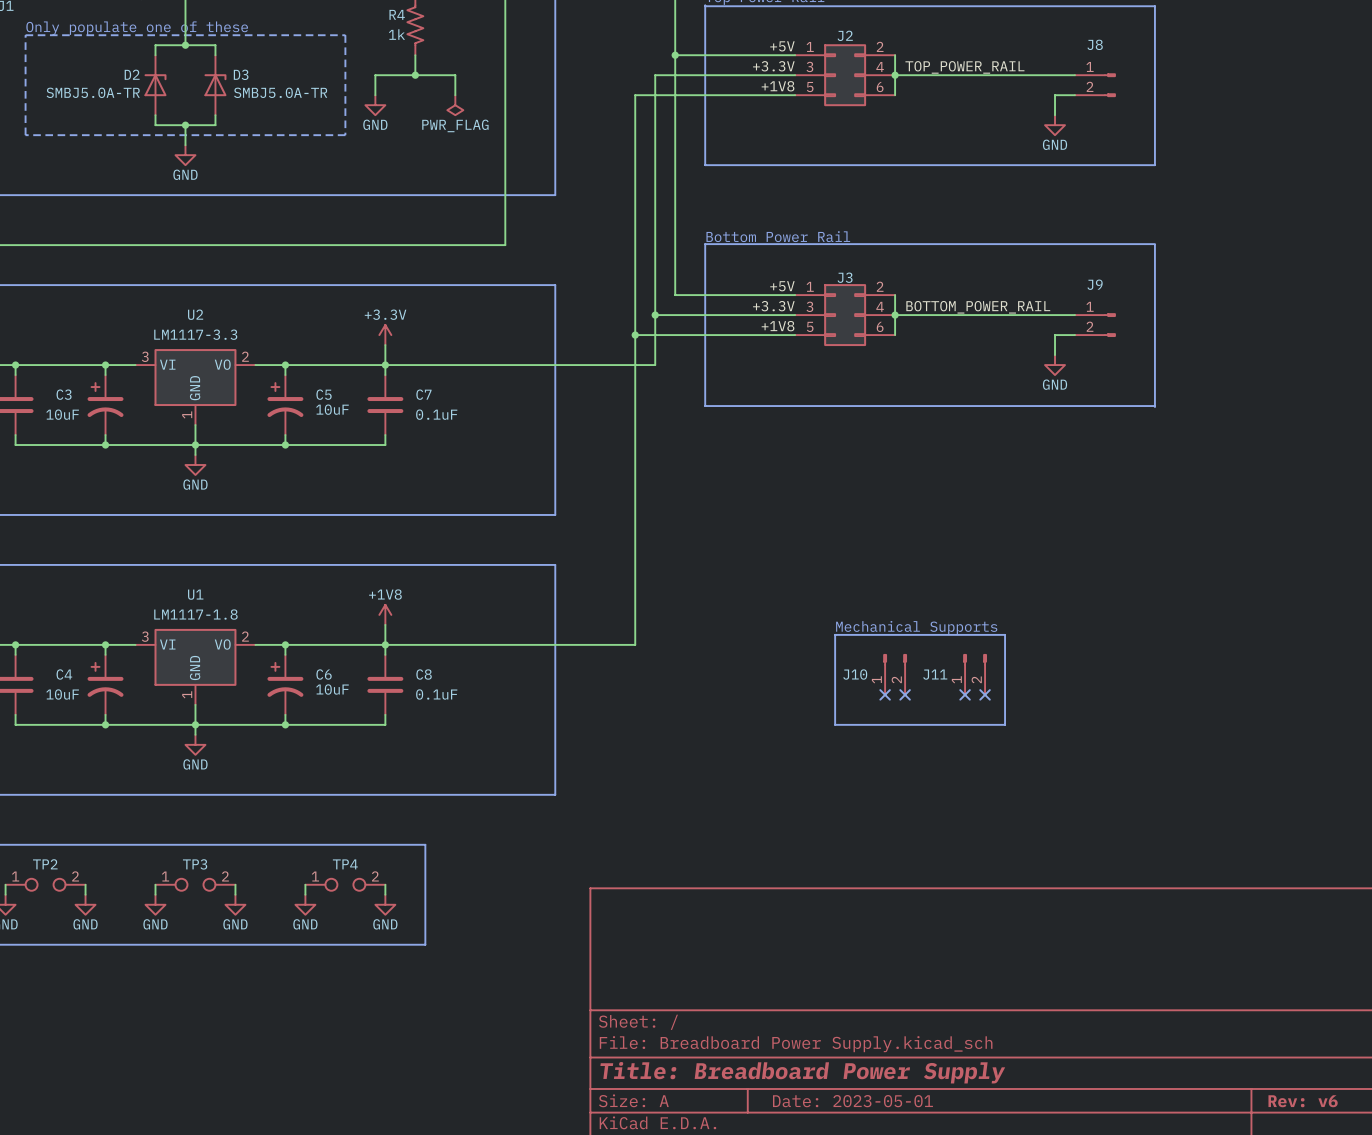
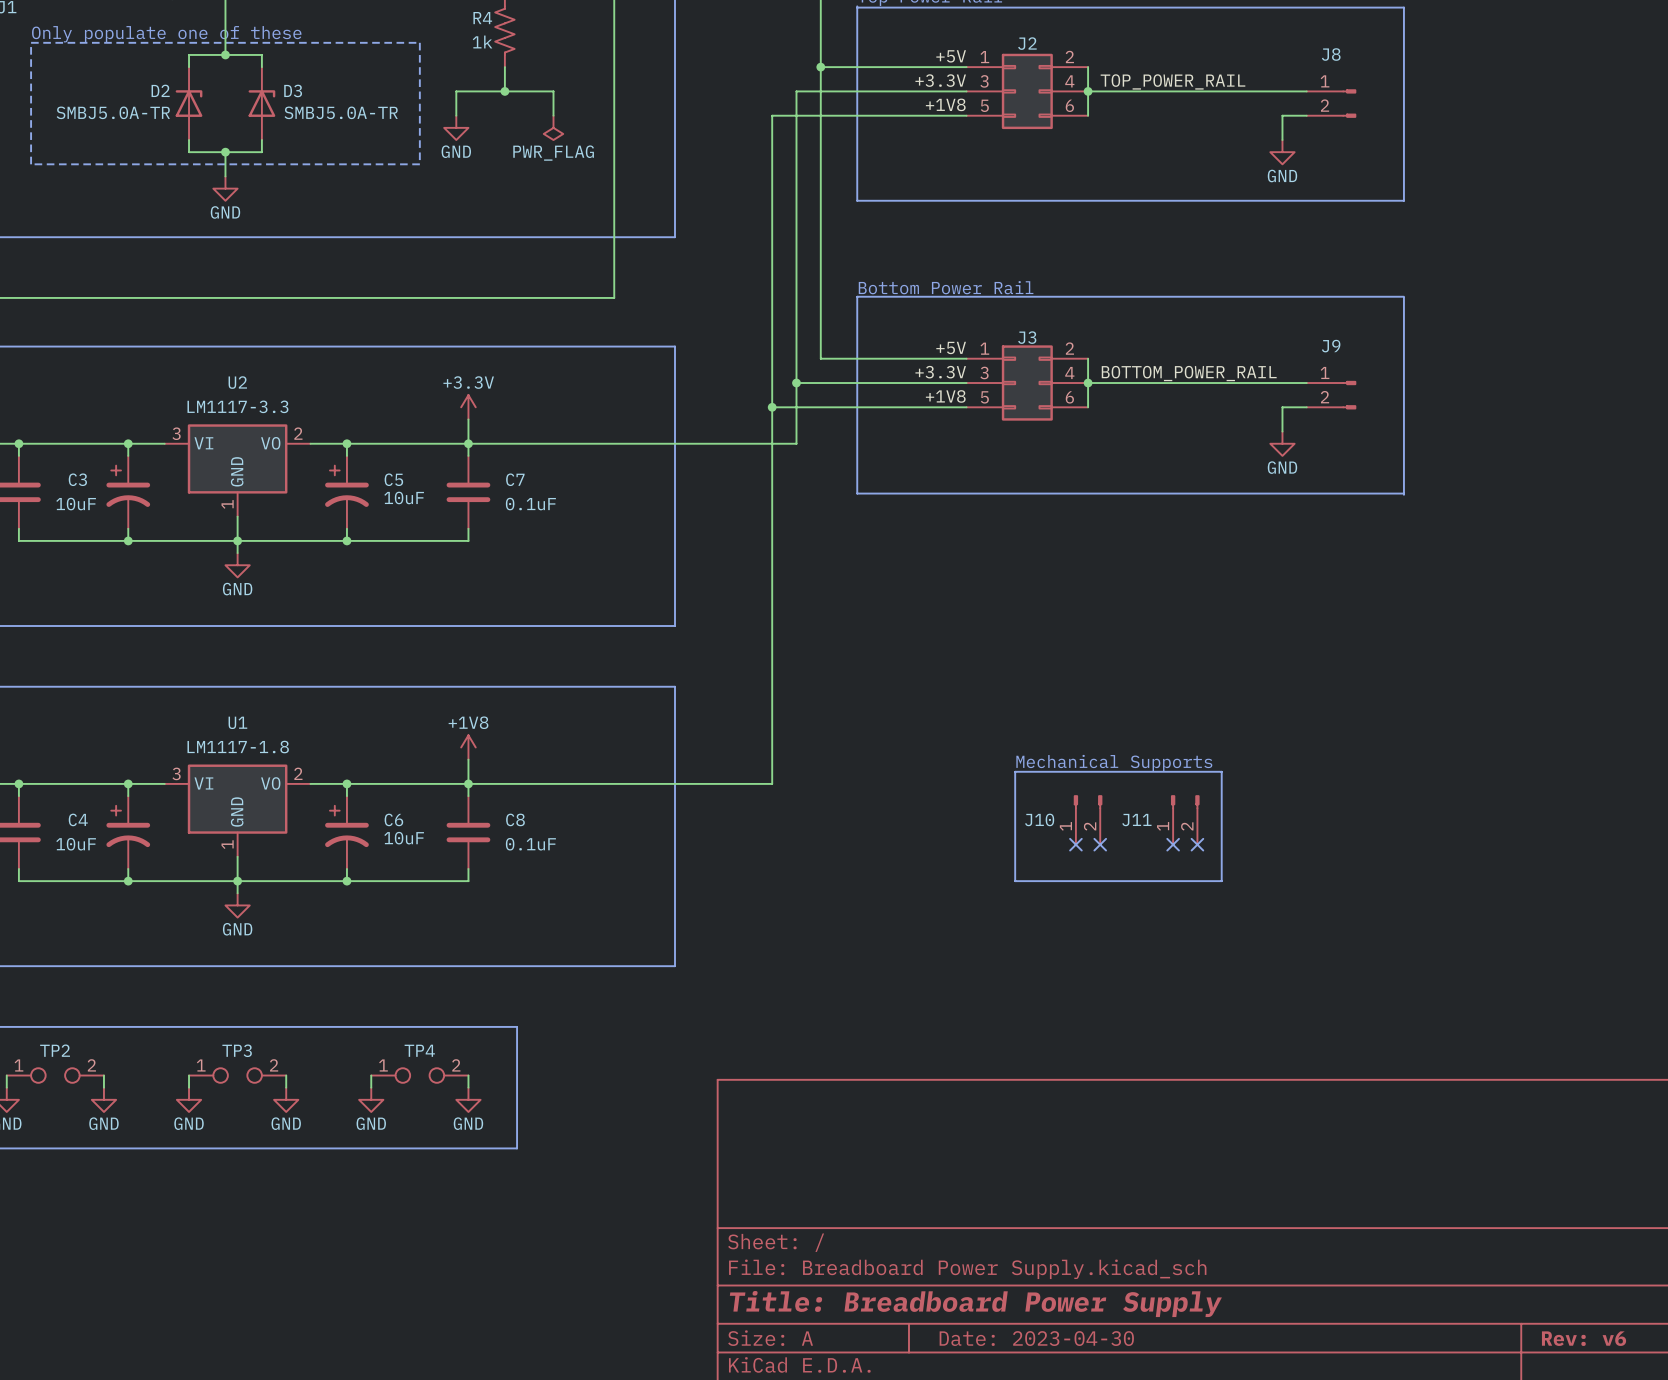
title block: Date: 2023-05-01 (852, 1101) -> Date: 2023-04-30 (1036, 1338)

